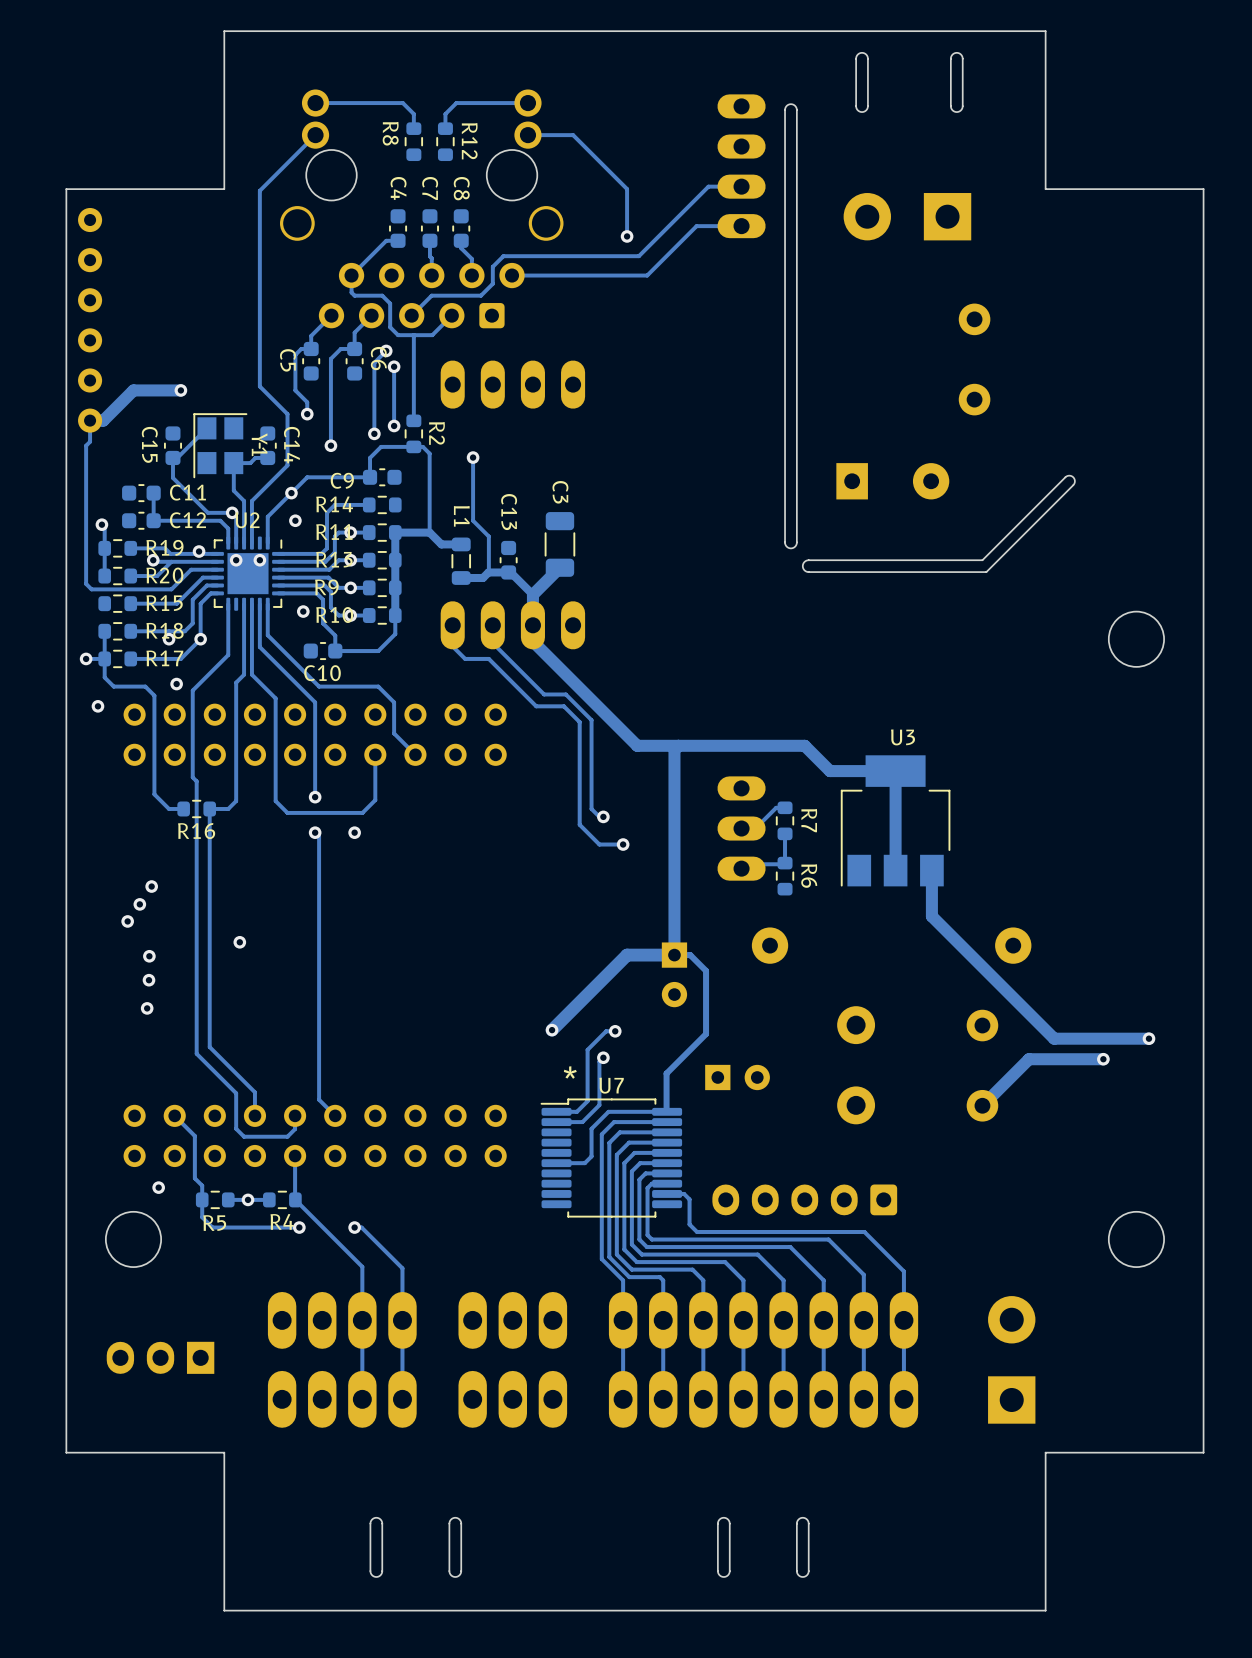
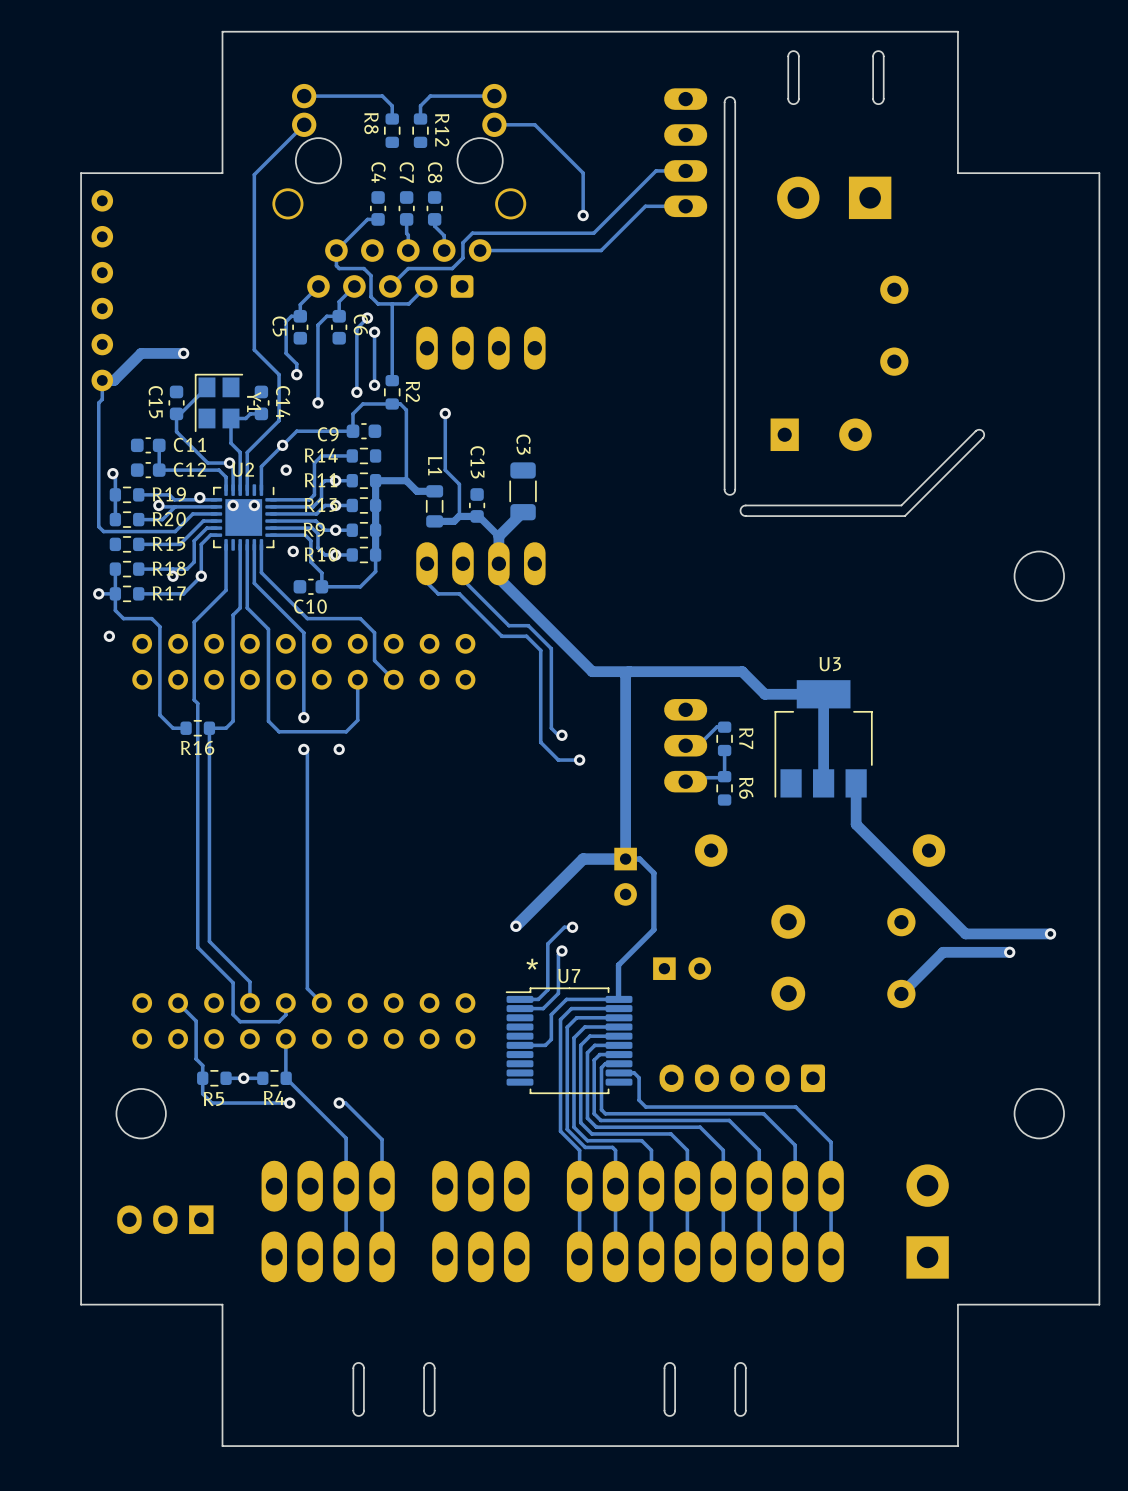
via: (176, 684) -> none
via: (151, 886) -> none
via: (139, 904) -> none
via: (127, 921) -> none
via: (239, 942) -> none
via: (149, 956) -> none
via: (148, 980) -> none
via: (147, 1008) -> none
via: (158, 1187) -> none

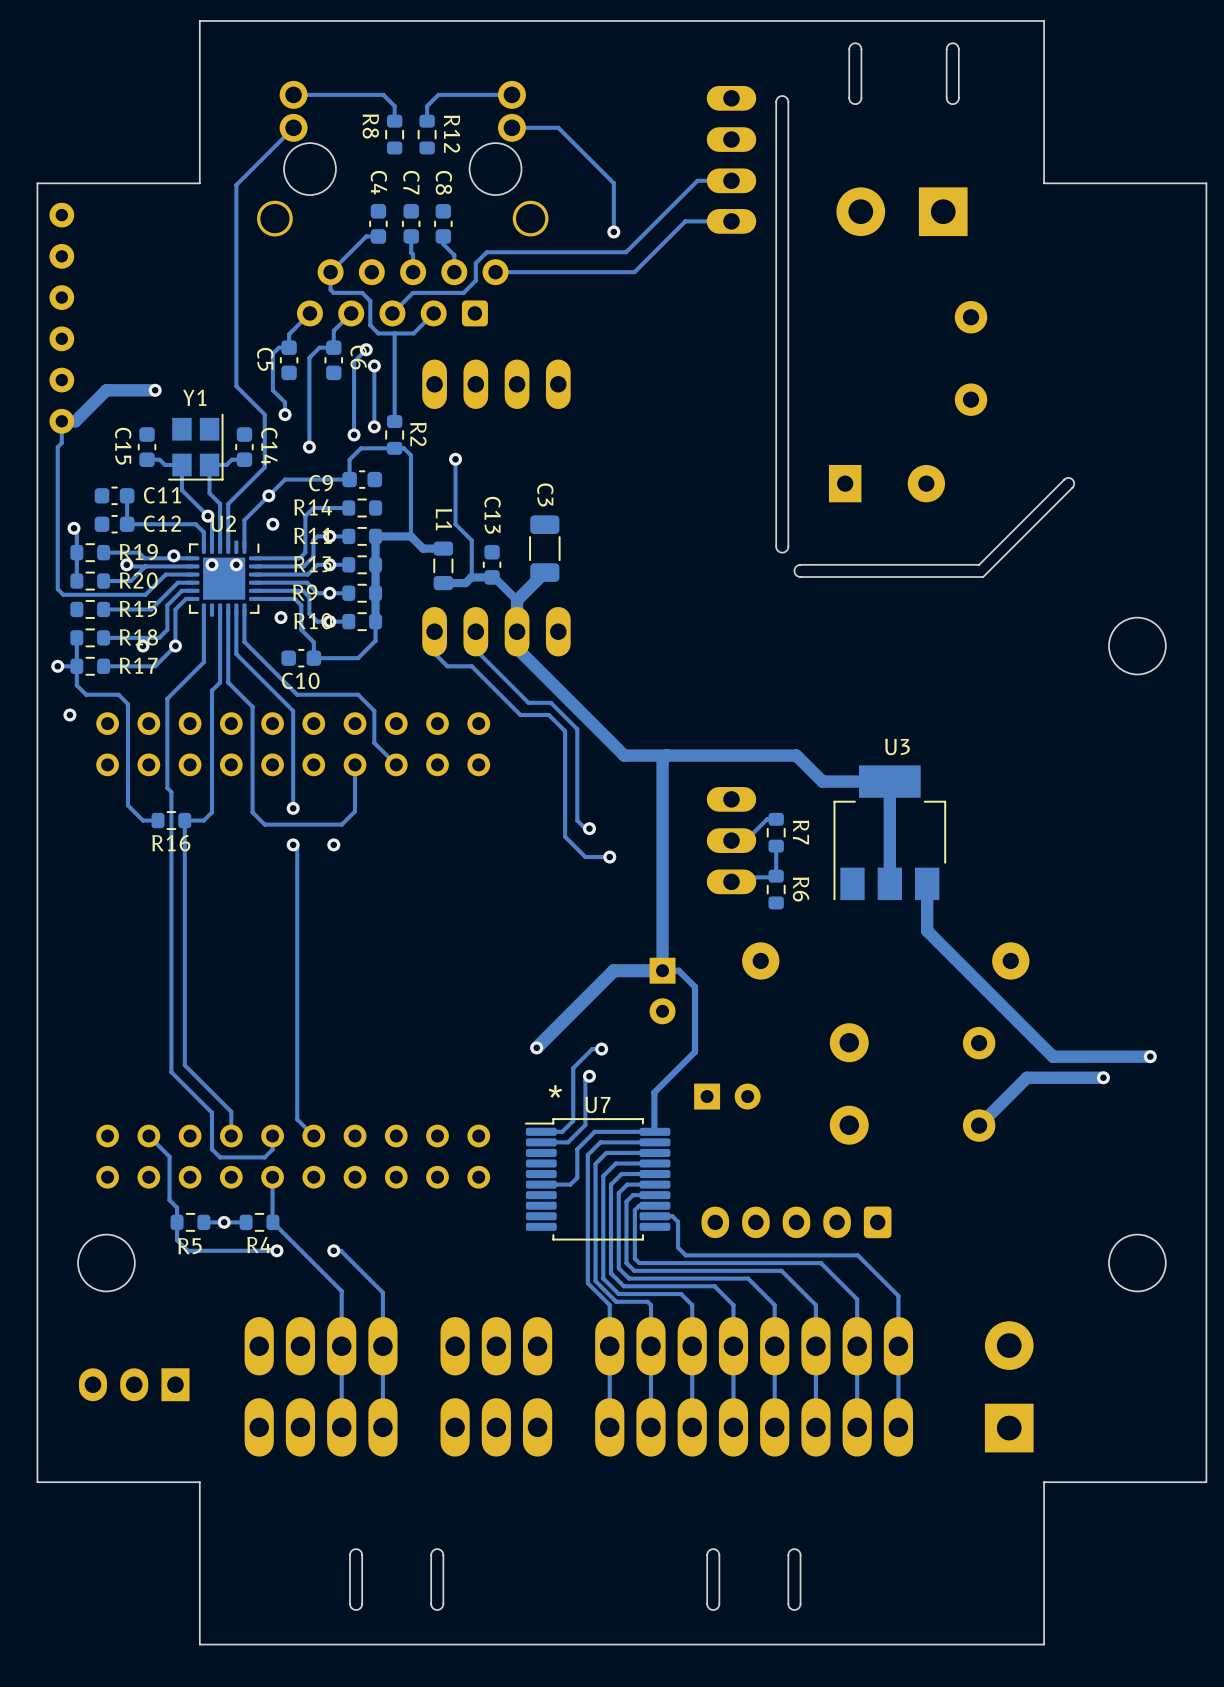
track: (206, 387) (180, 413) -> none
Y1 rotation: 0° (218, 402) -> 180° (195, 447)
Y1 name position: Y1 (254, 402) -> Y1 (194, 397)
track: (176, 413) (176, 431) (207, 463) (229, 463) -> (151, 459) (159, 459) (164, 464) (181, 464) (181, 490) (207, 516)

